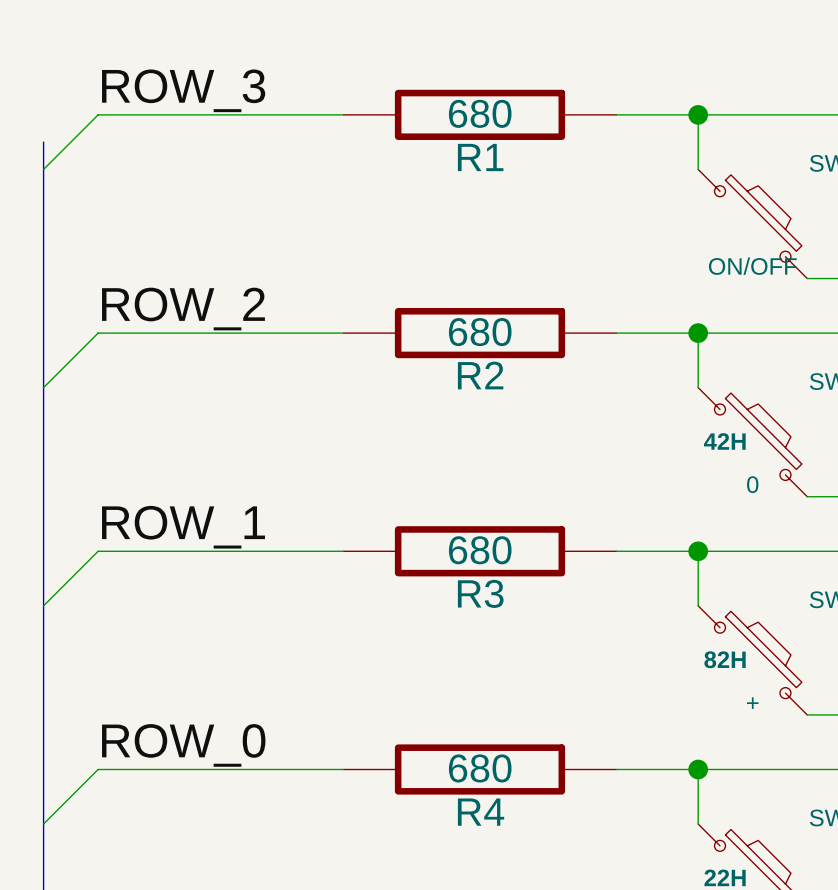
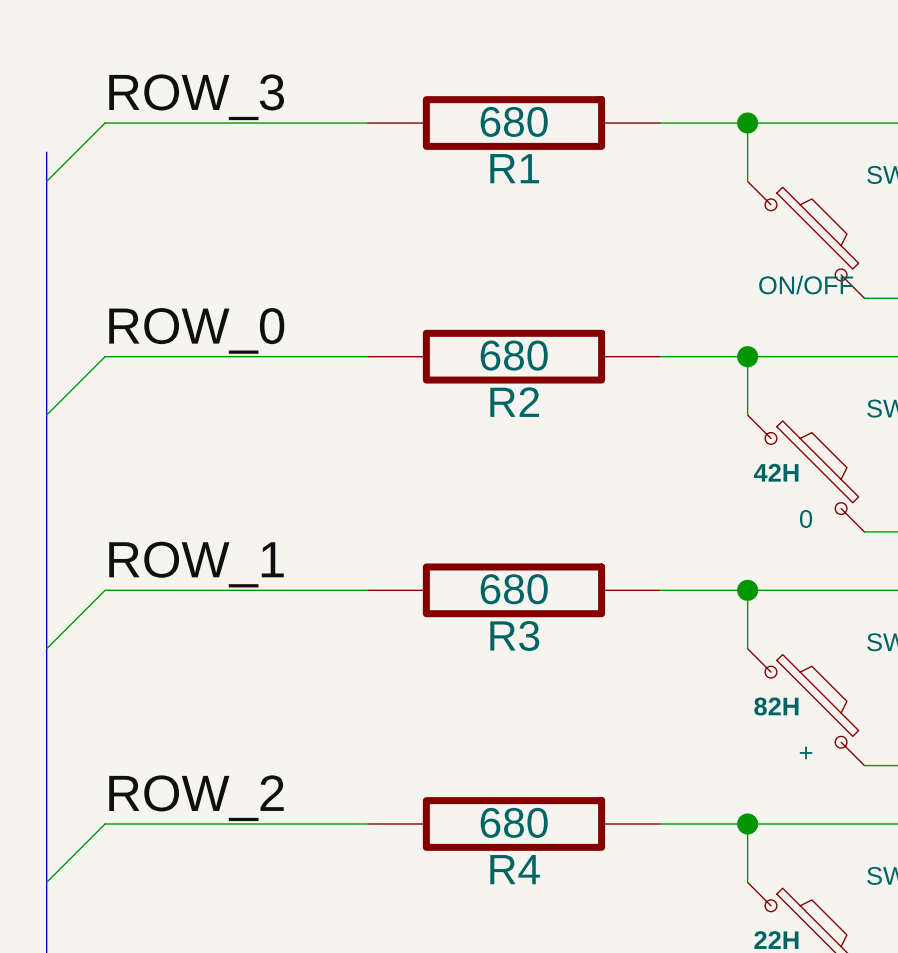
label: ROW_2 (183, 309) -> ROW_0 (196, 330)
label: ROW_0 (183, 745) -> ROW_2 (196, 798)

